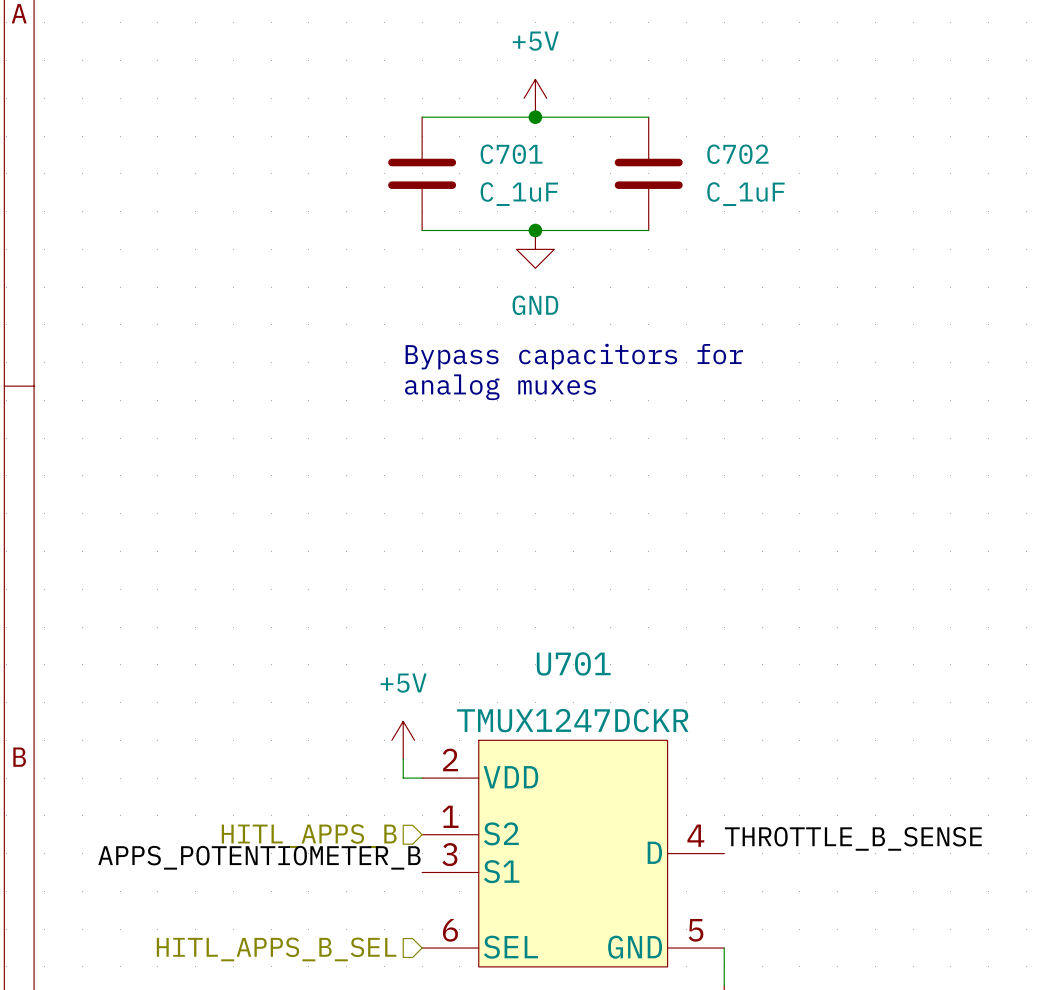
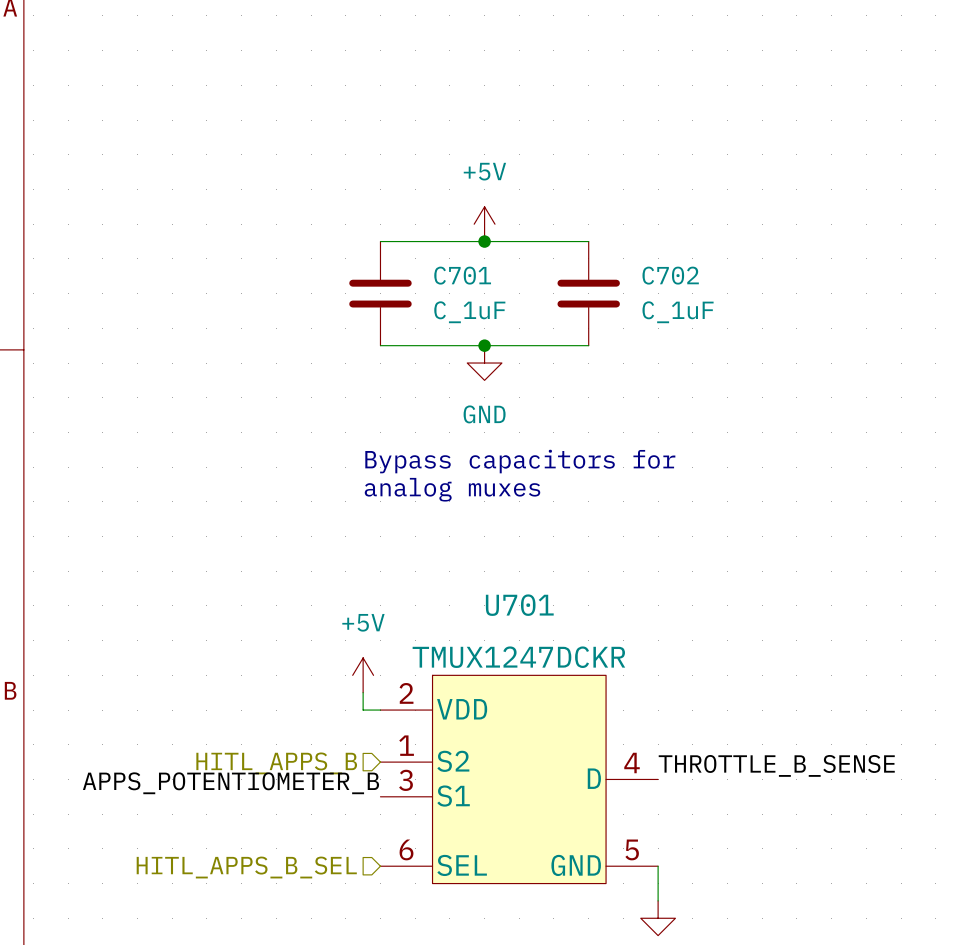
power symbol: +5V (535, 98) -> none
wire: (422, 117) (648, 117) -> (380, 241) (588, 241)
junction: (535, 117) -> none
C701 position: (422, 173) -> (380, 293)
C702 position: (648, 173) -> (588, 293)
wire: (422, 230) (648, 230) -> (380, 345) (588, 345)
junction position: (535, 230) -> (484, 241)
power symbol: GND (535, 249) -> +5V (484, 224)
text position: Bypass capacitors for (574, 356) -> Bypass capacitors for (520, 461)
junction: none -> (484, 345)
text position: analog muxes (500, 387) -> analog muxes (452, 489)
power symbol: none -> GND (484, 363)

